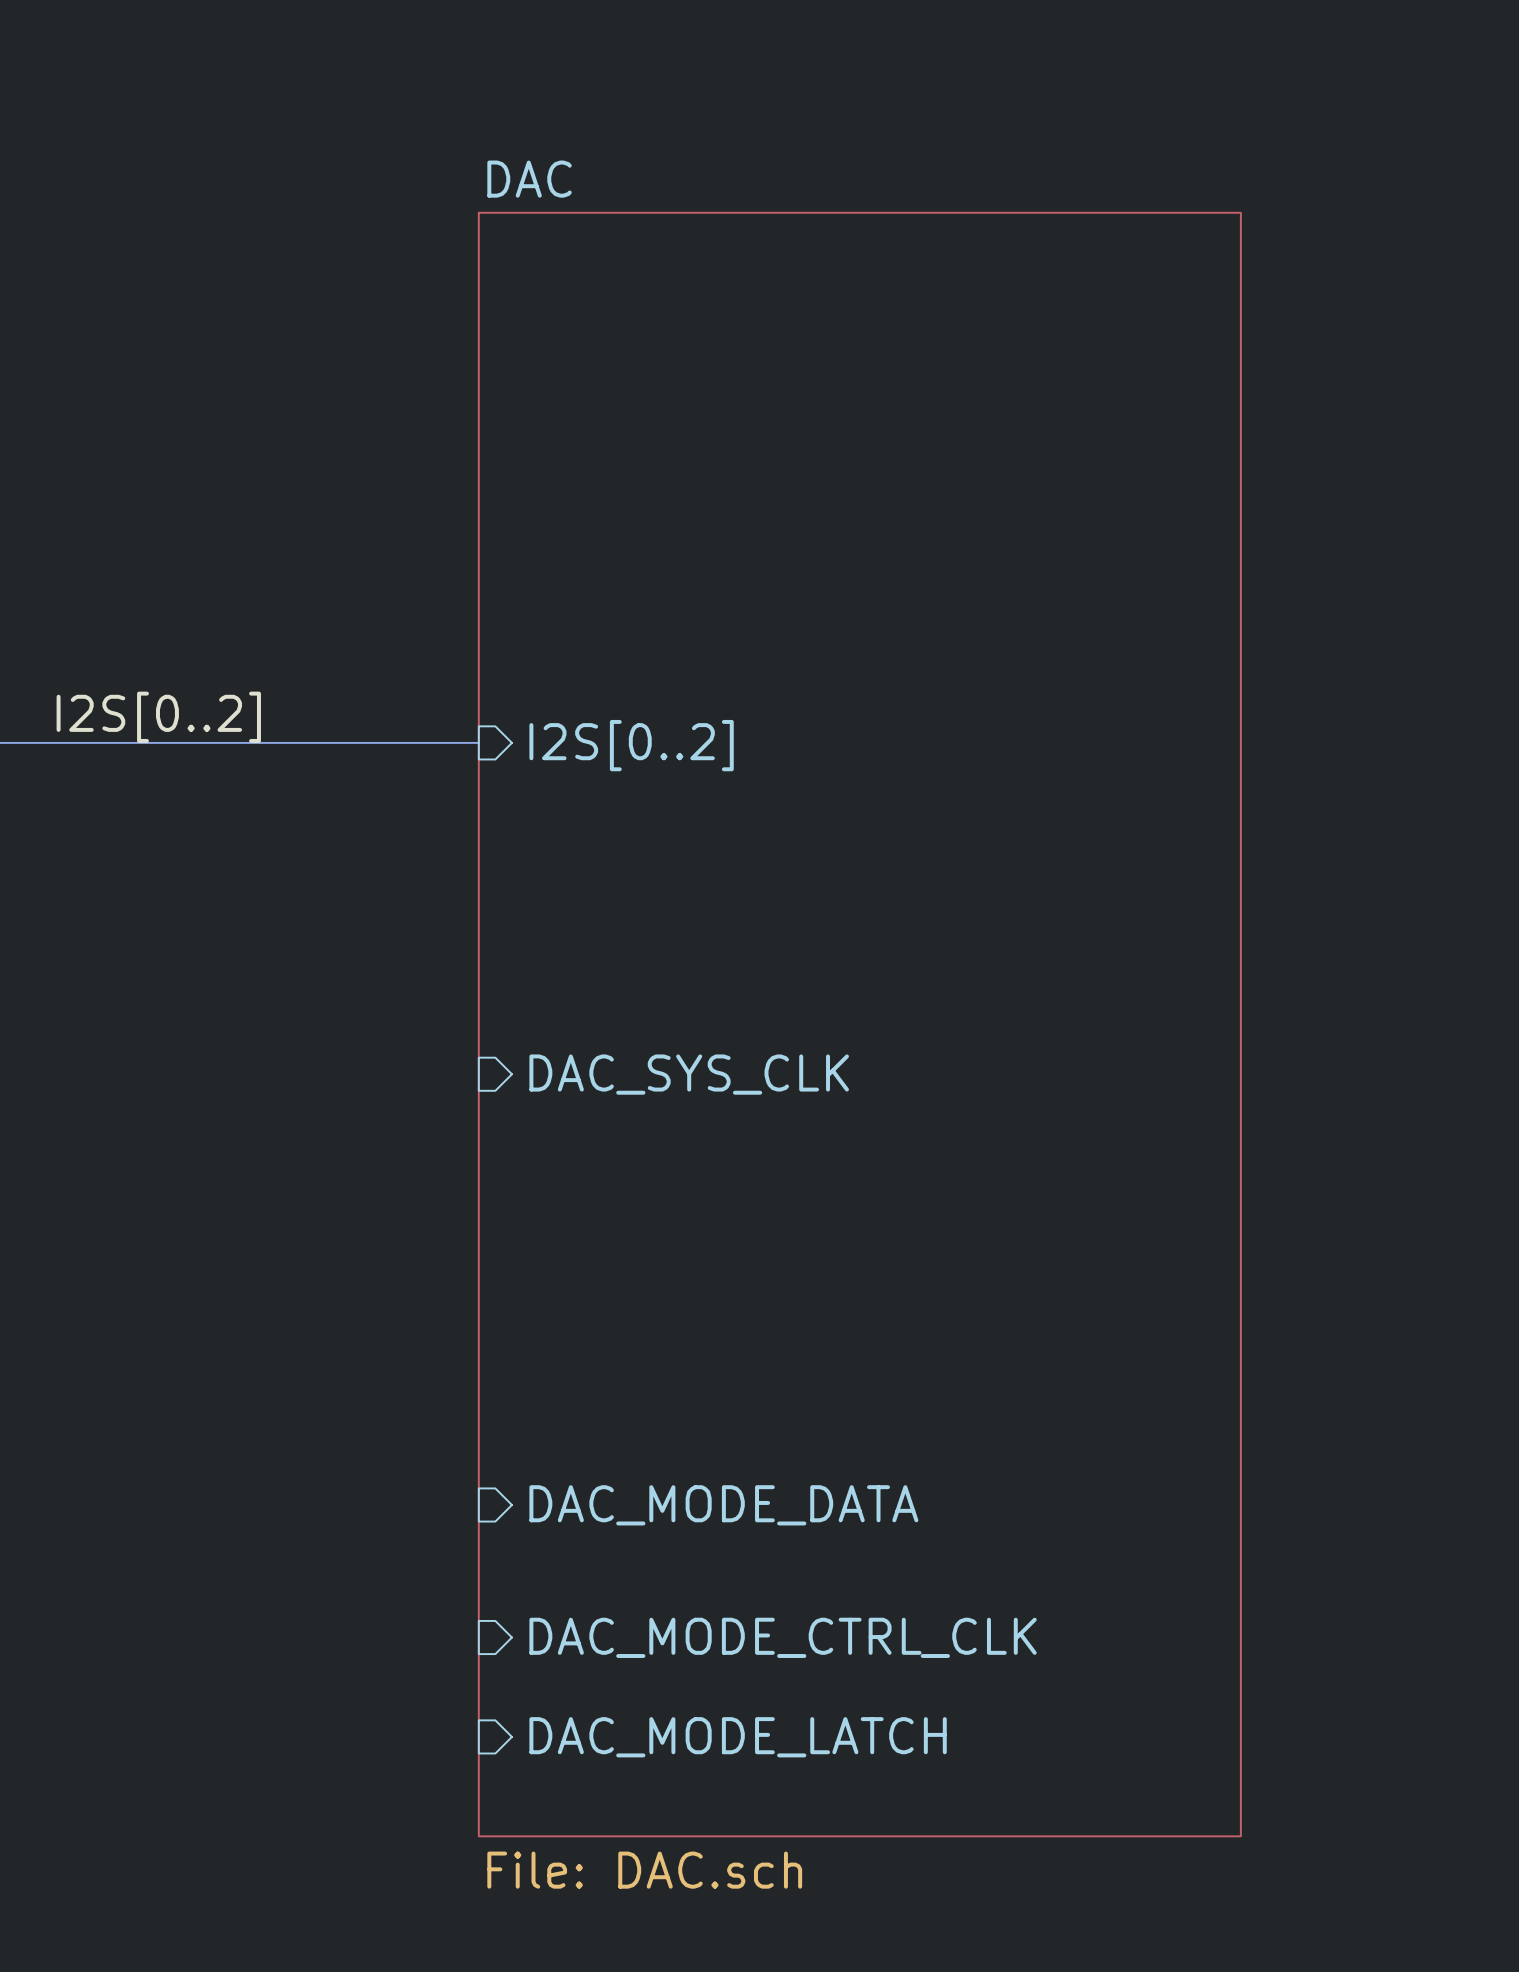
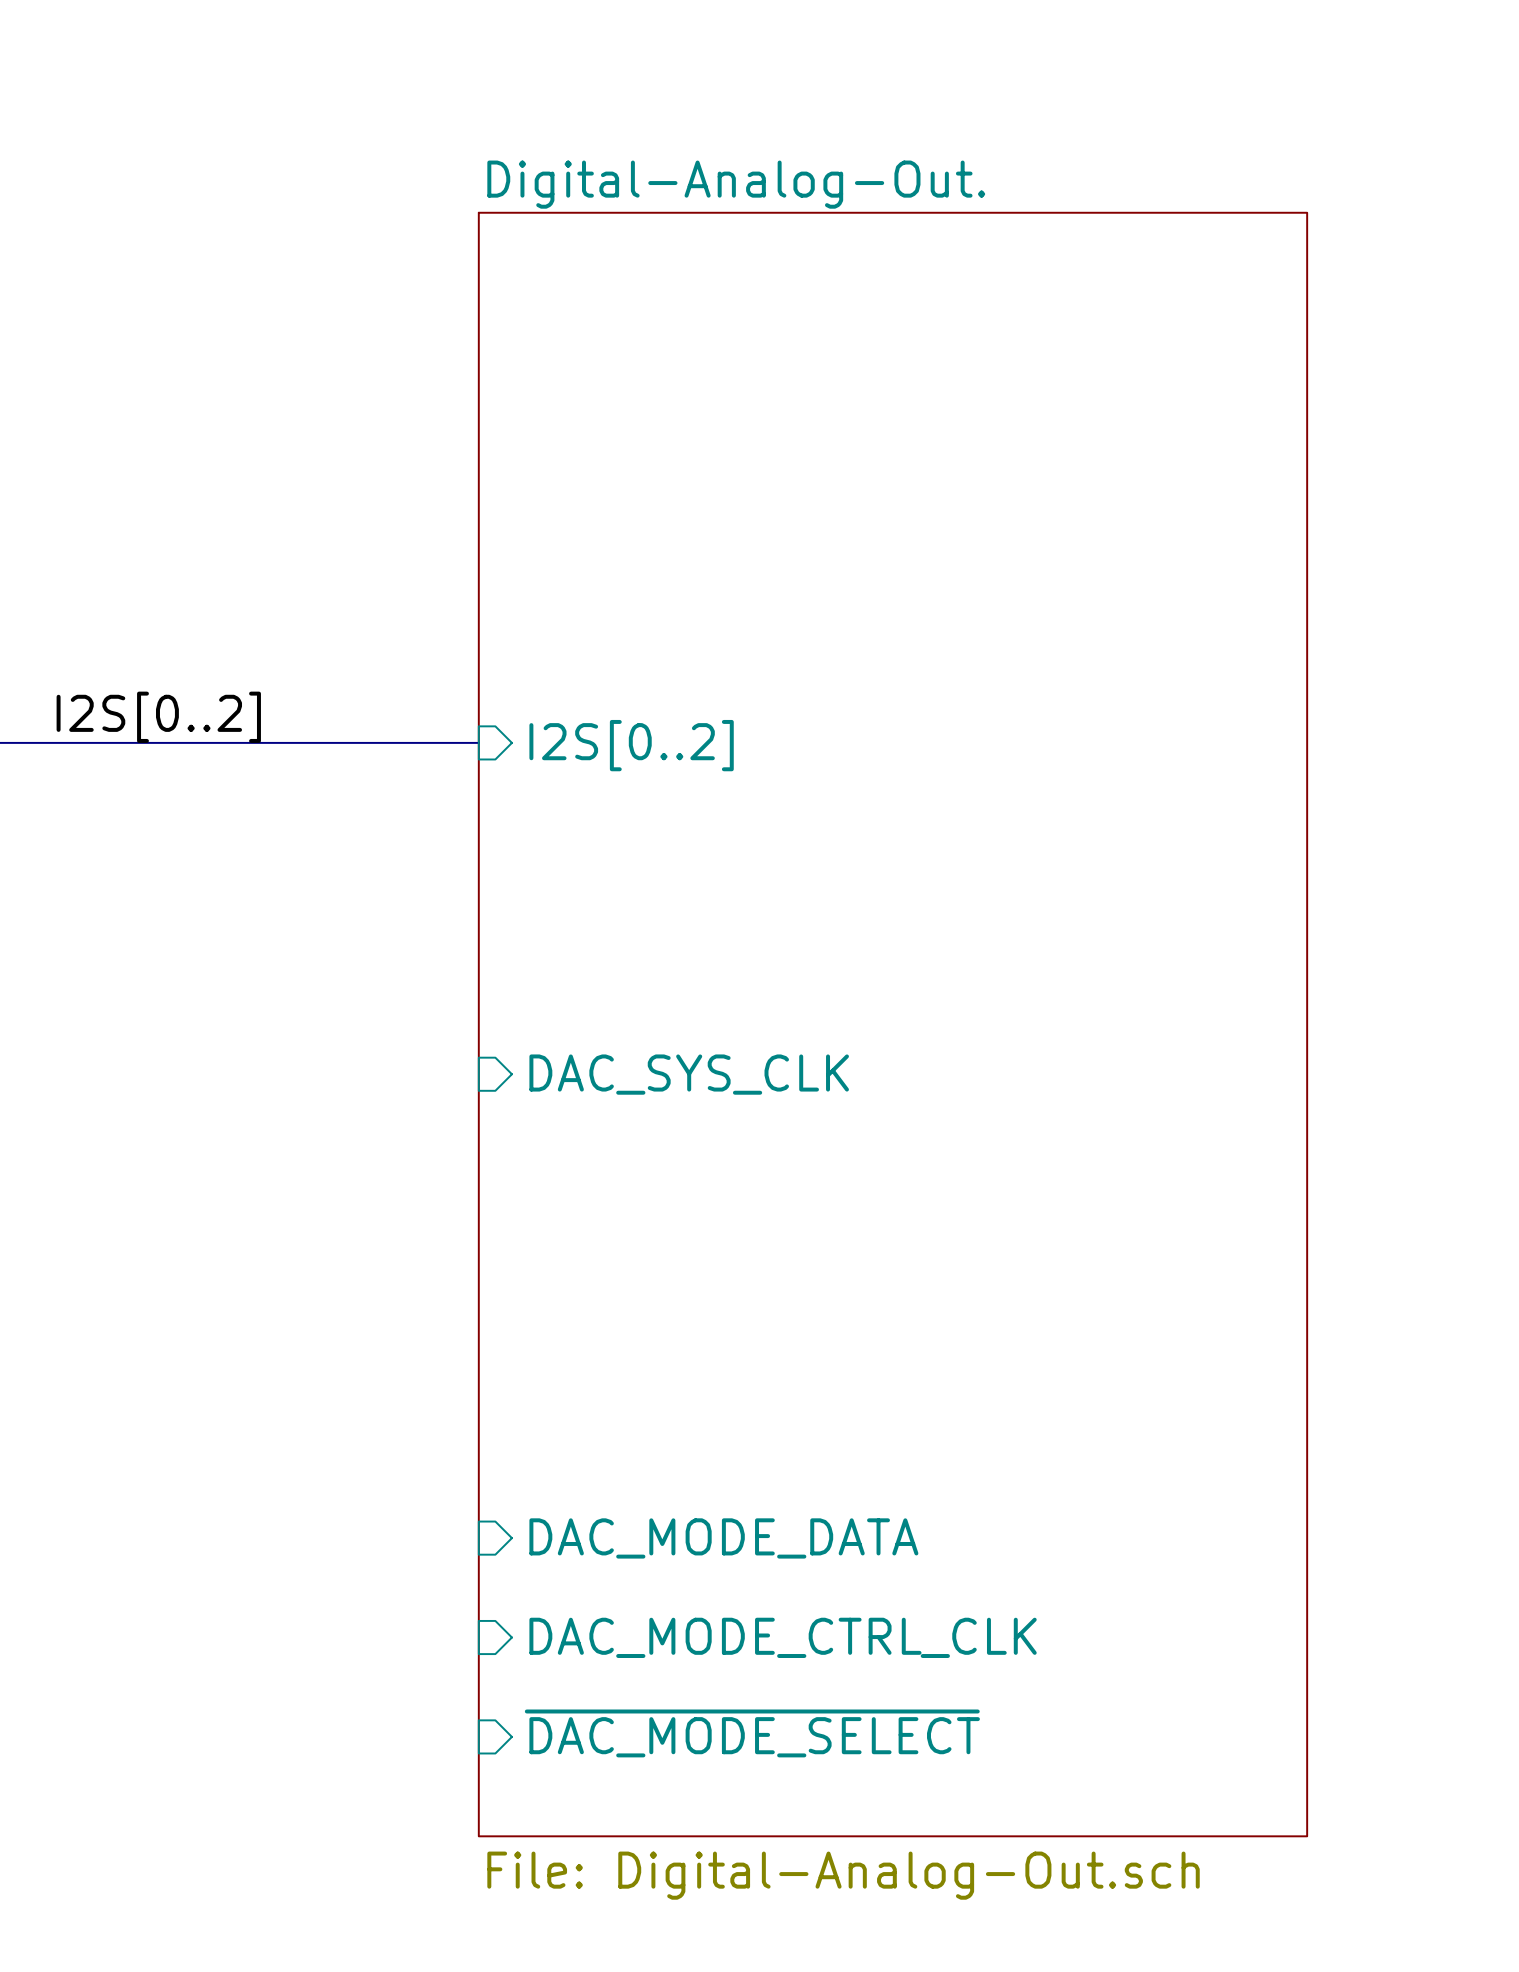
sheet DAC: File: DAC.sch (859, 1024) -> none
sheet Digital-Analog-Out.: none -> File: Digital-Analog-Out.sch (892, 1024)
sheet pin position: DAC_MODE_DATA (723, 1505) -> DAC_MODE_DATA (723, 1538)
sheet pin: DAC_MODE_LATCH (738, 1737) -> ~{DAC_MODE_SELECT} (752, 1733)

